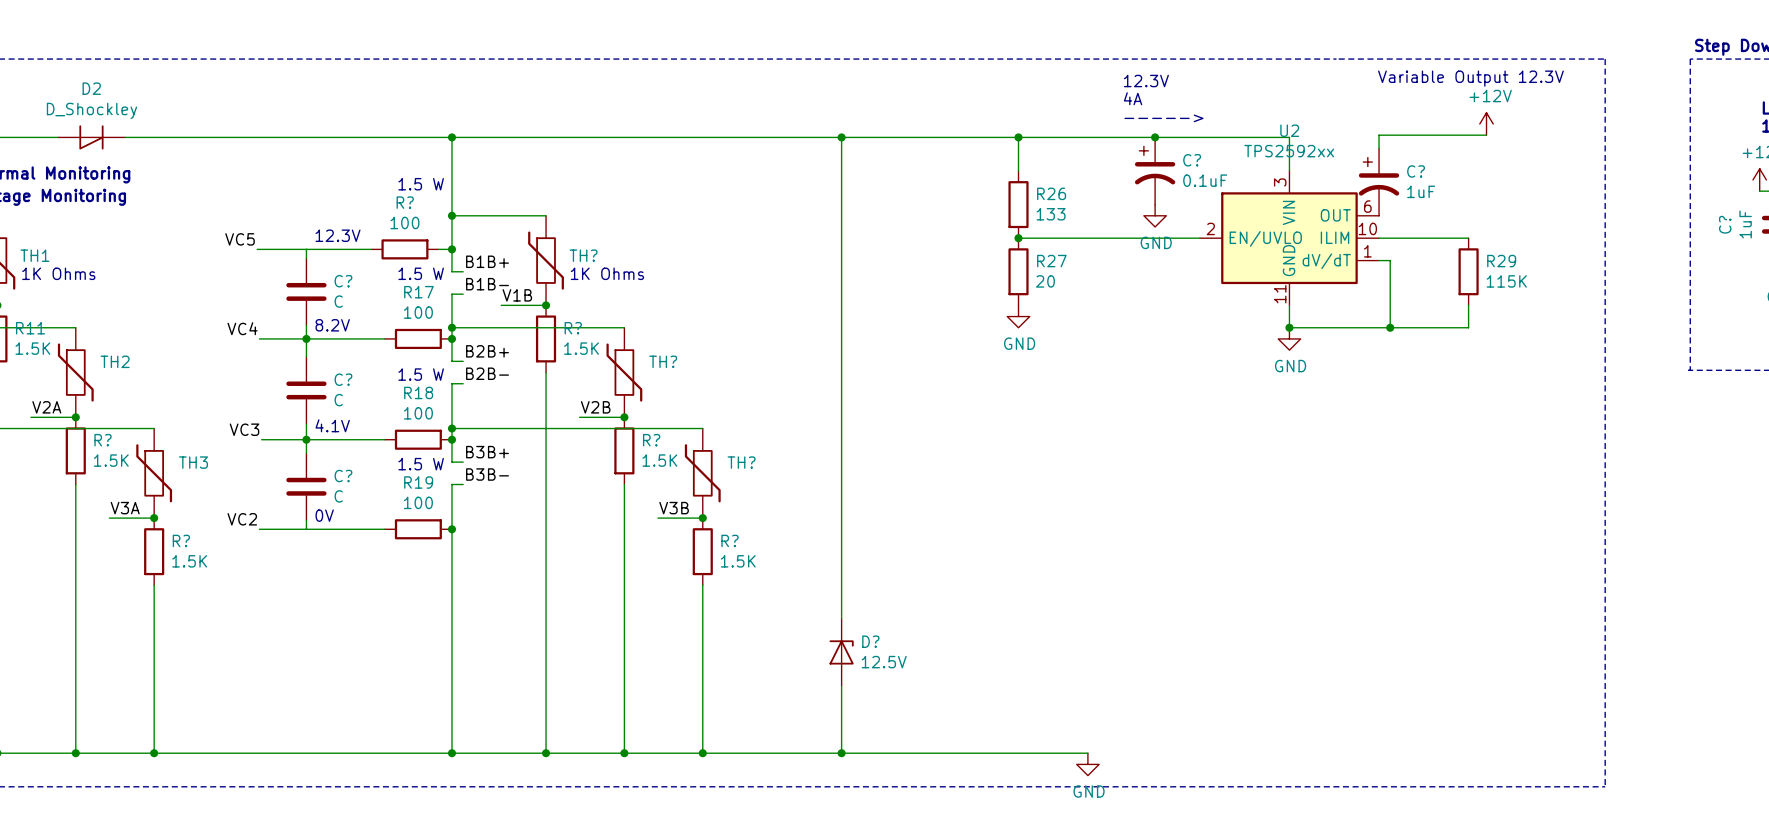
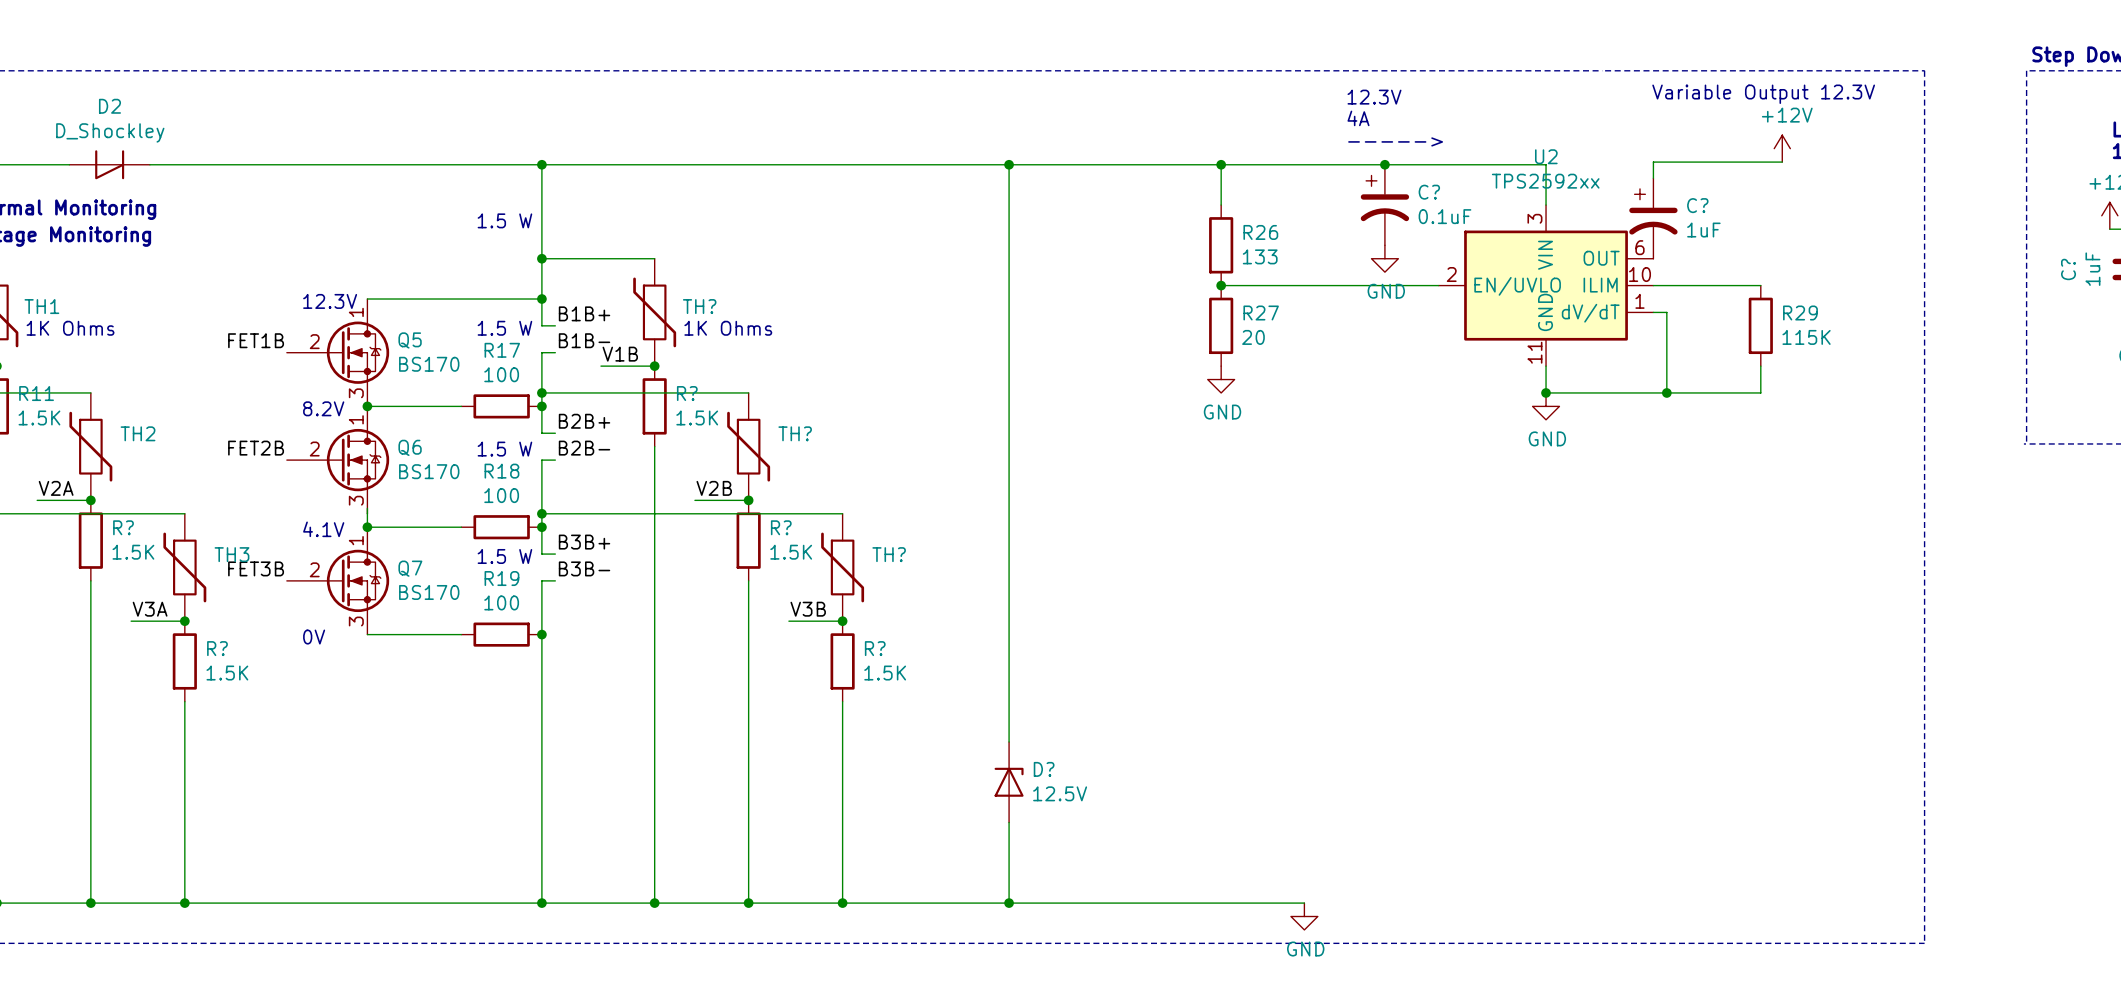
text position: 12.3V (338, 235) -> 12.3V (330, 301)
label: VC5 (240, 239) -> none
wire: (257, 249) (306, 249) (306, 258) -> none
wire: none -> (445, 299) (525, 299)
R?: 100 (404, 249) -> none
label: none -> FET1B (256, 340)
C?: C (306, 291) -> none
Q5: none -> BS170 (338, 352)
text position: 8.2V (332, 325) -> 8.2V (323, 408)
label: VC4 (242, 328) -> none
wire: (259, 338) (306, 338) -> none
label: none -> FET2B (256, 448)
Q6: none -> BS170 (338, 460)
C?: C (306, 390) -> none
text position: 4.1V (332, 425) -> 4.1V (323, 529)
label: VC3 (244, 429) -> none
wire: (261, 439) (306, 439) (306, 453) -> none
label: none -> FET3B (256, 568)
Q7: none -> BS170 (338, 580)
C?: C (306, 486) -> none
text position: 0V (324, 515) -> 0V (314, 637)
label: VC2 (242, 519) -> none
wire: (306, 520) (306, 529) (259, 529) -> none

